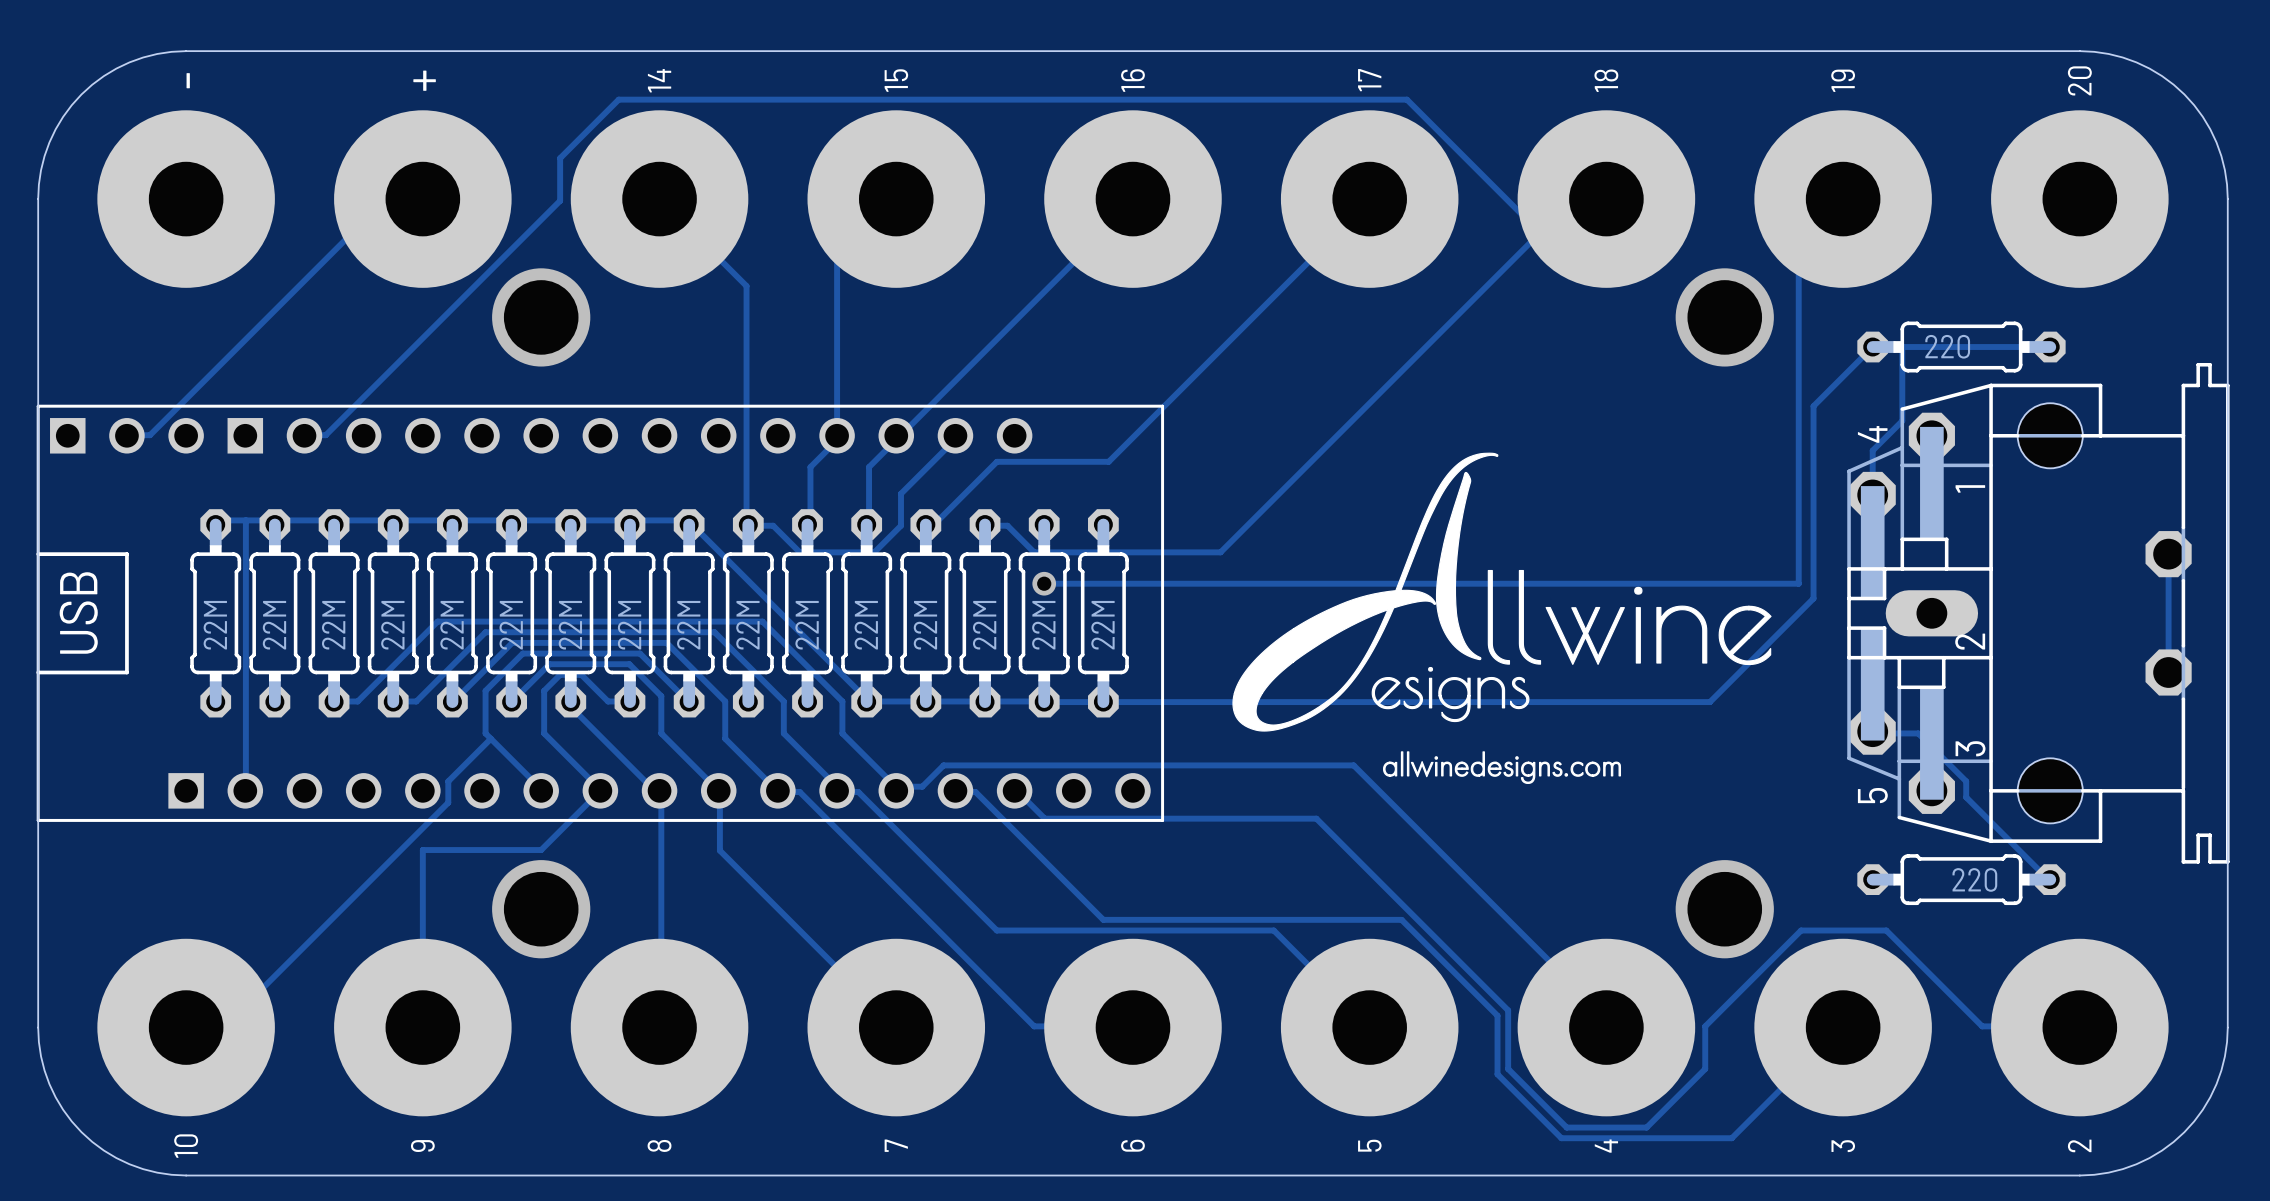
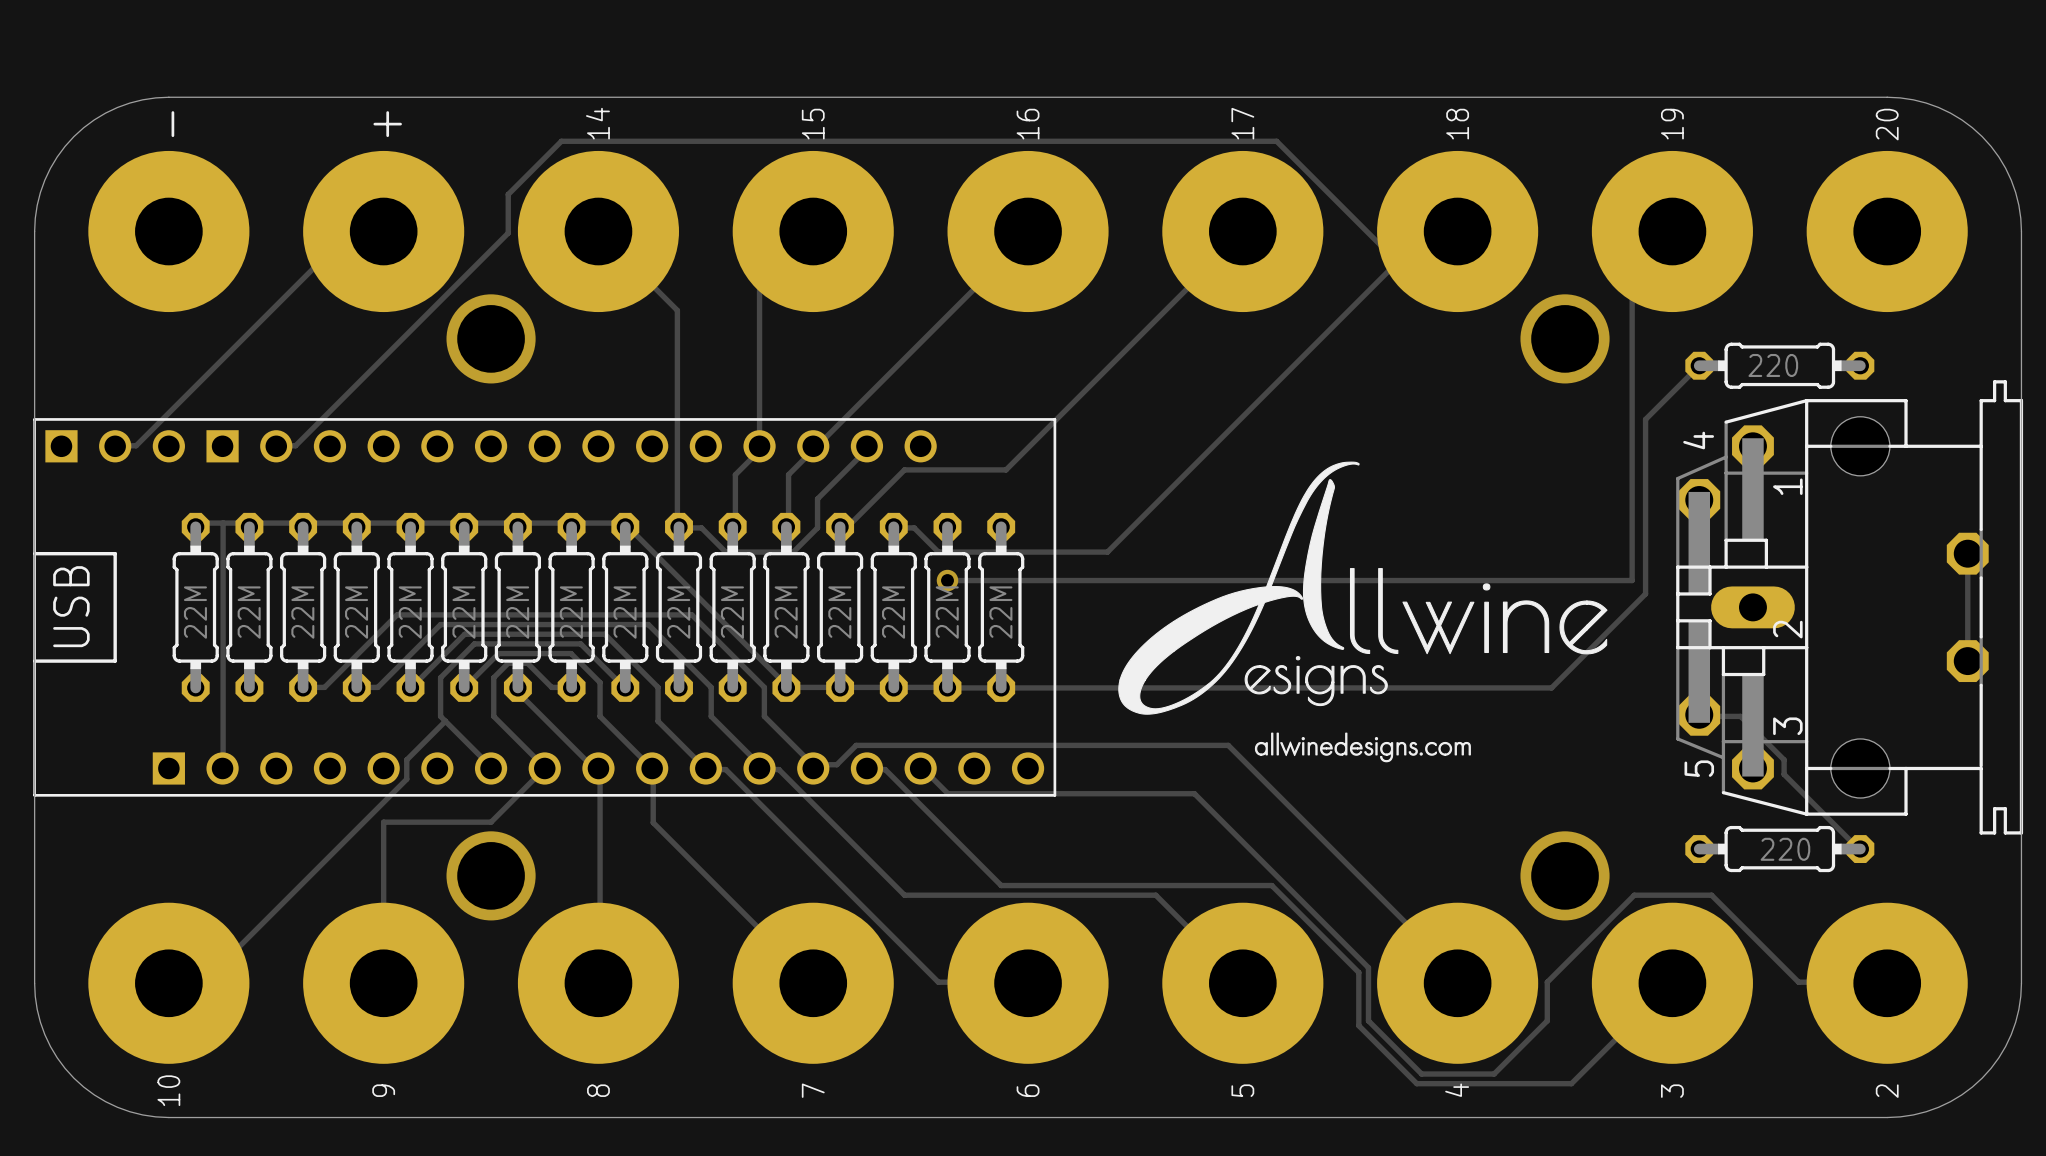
track: (2050, 347) (1902, 347) (1902, 420) (1872, 450) (1872, 494) -> none

